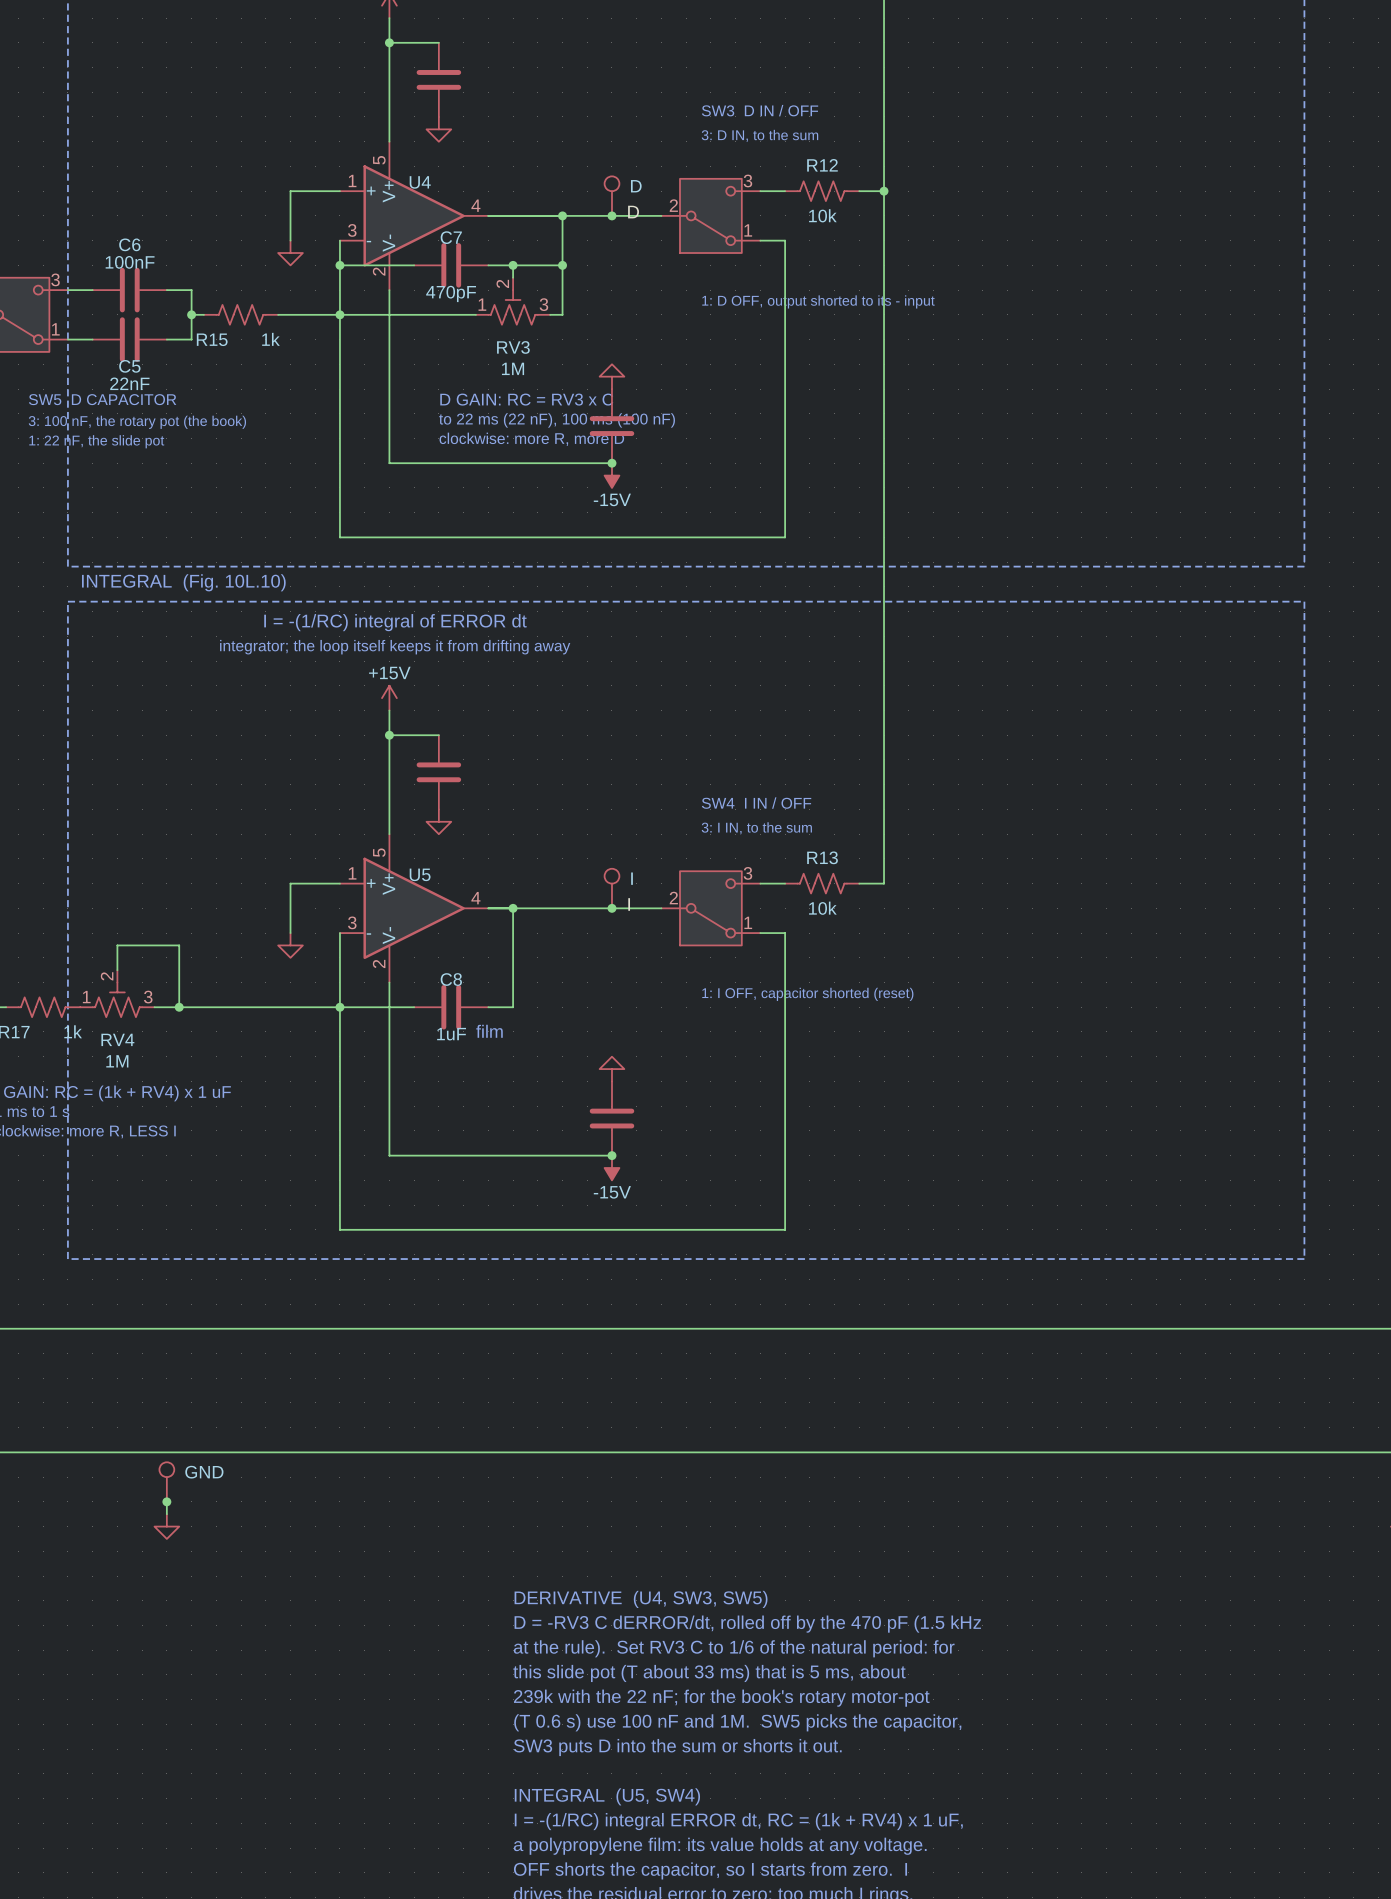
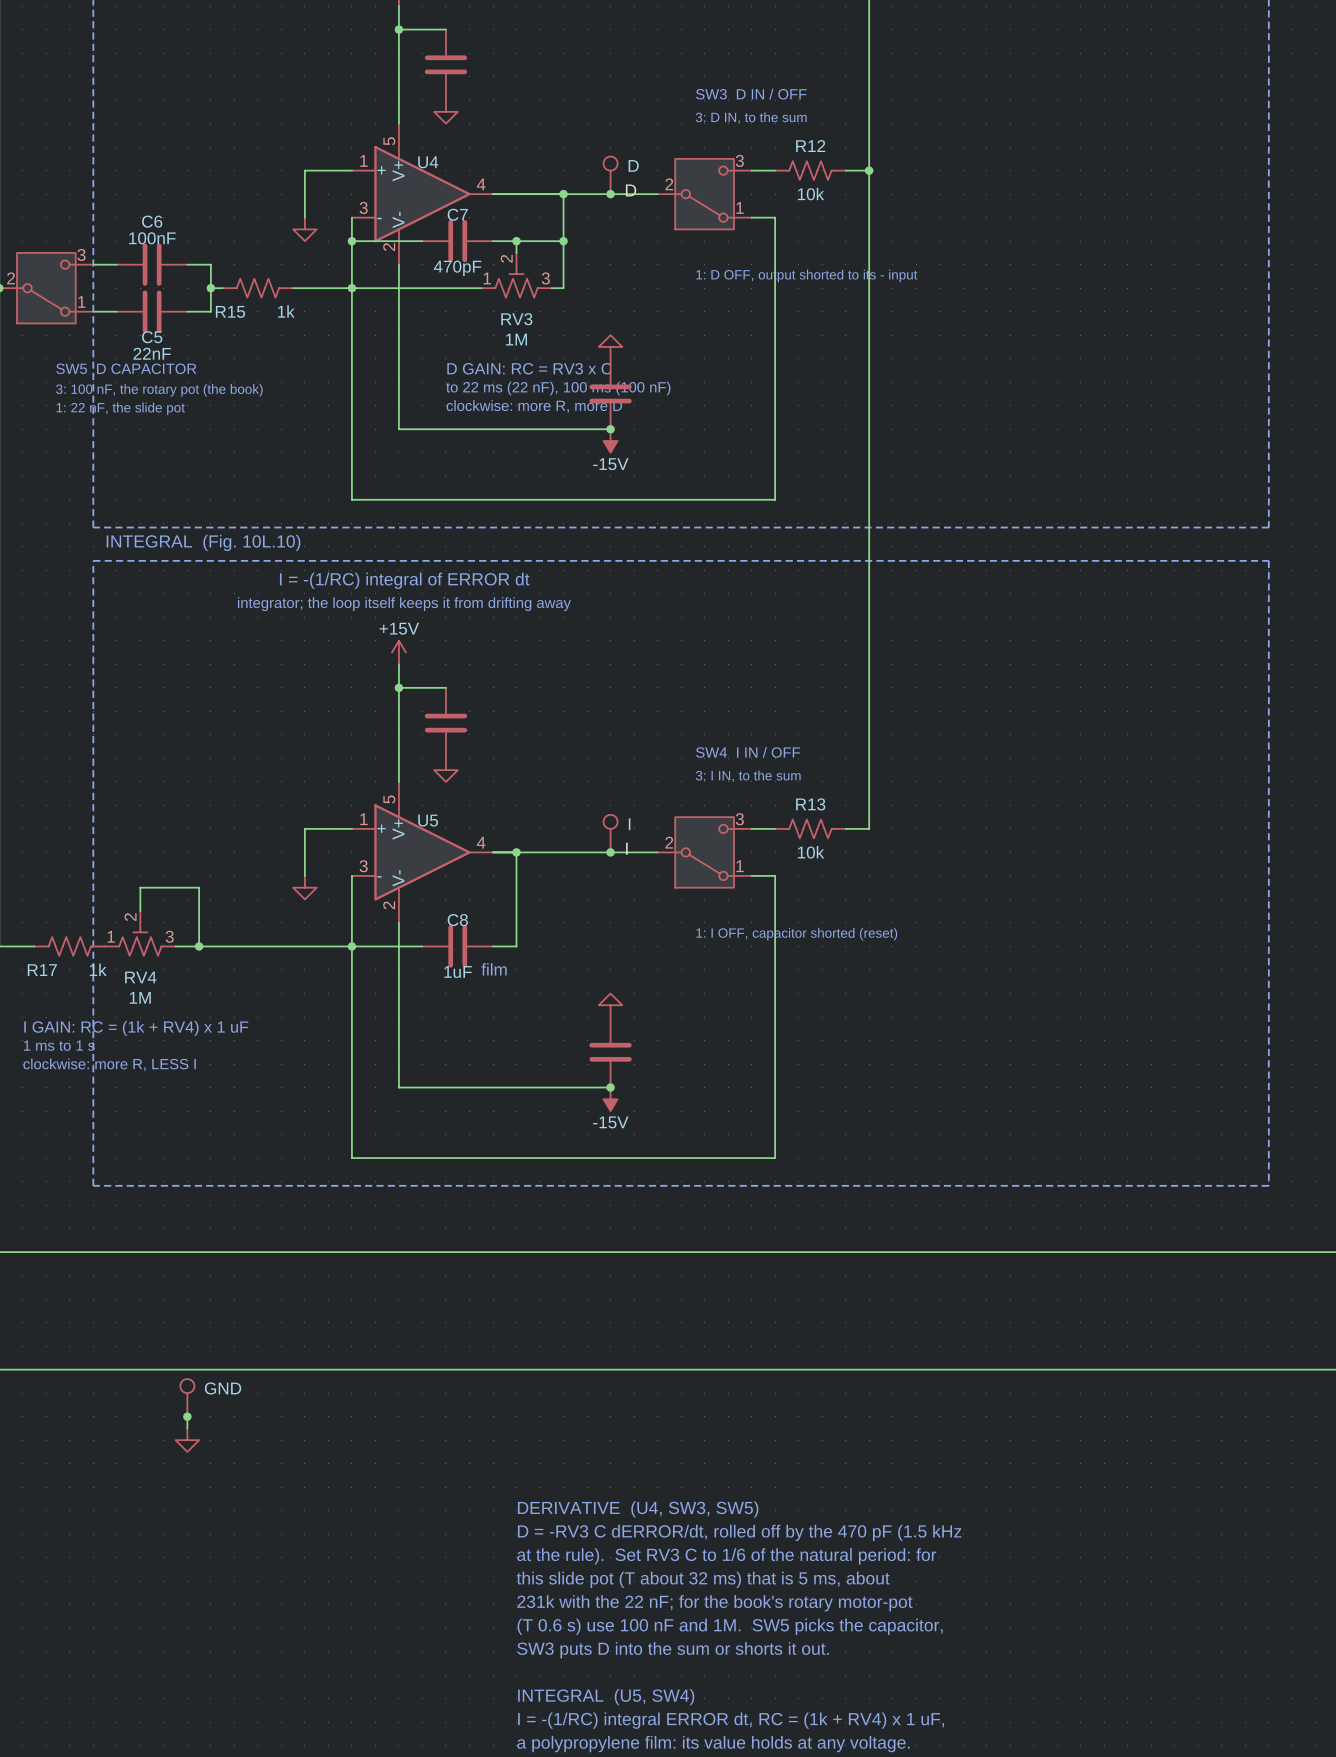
text: this slide pot (T about 33 ms) that is 5 ms, about (709, 1673) -> this slide pot (T about 32 ms) that is 5 ms, about (703, 1579)
text: 239k with the 22 nF; for the book's rotary motor-pot (721, 1698) -> 231k with the 22 nF; for the book's rotary motor-pot (714, 1603)

